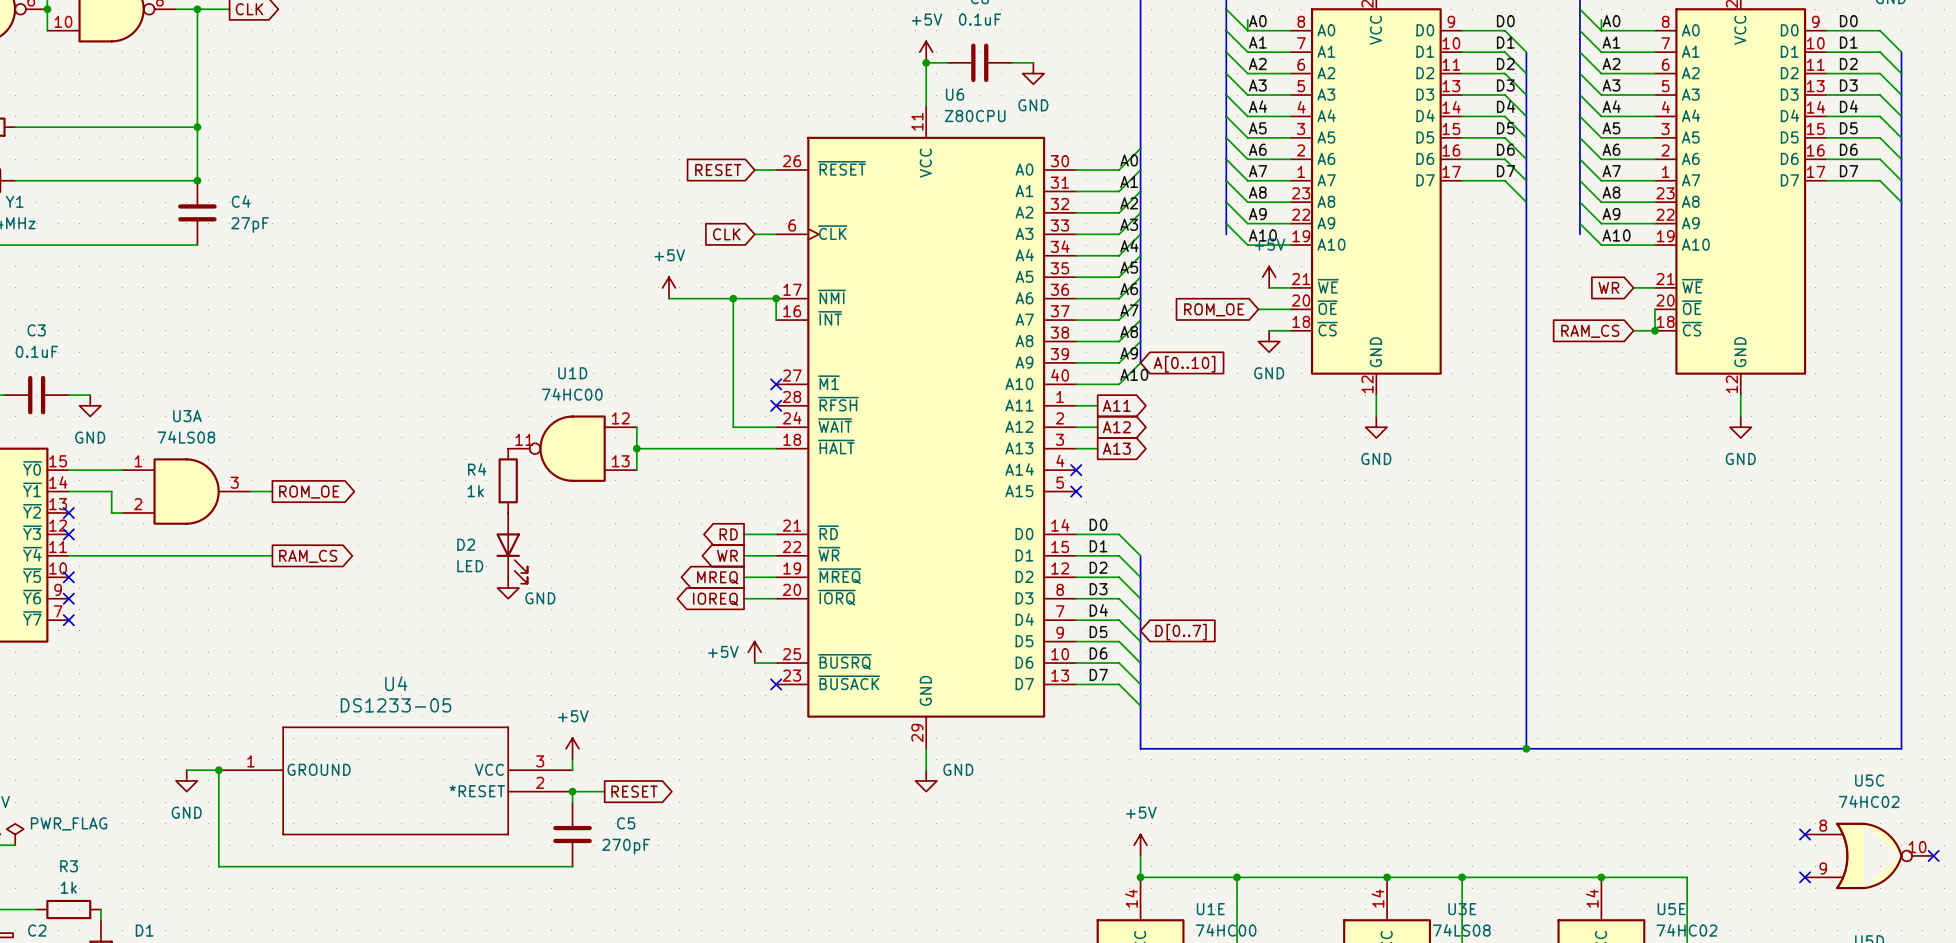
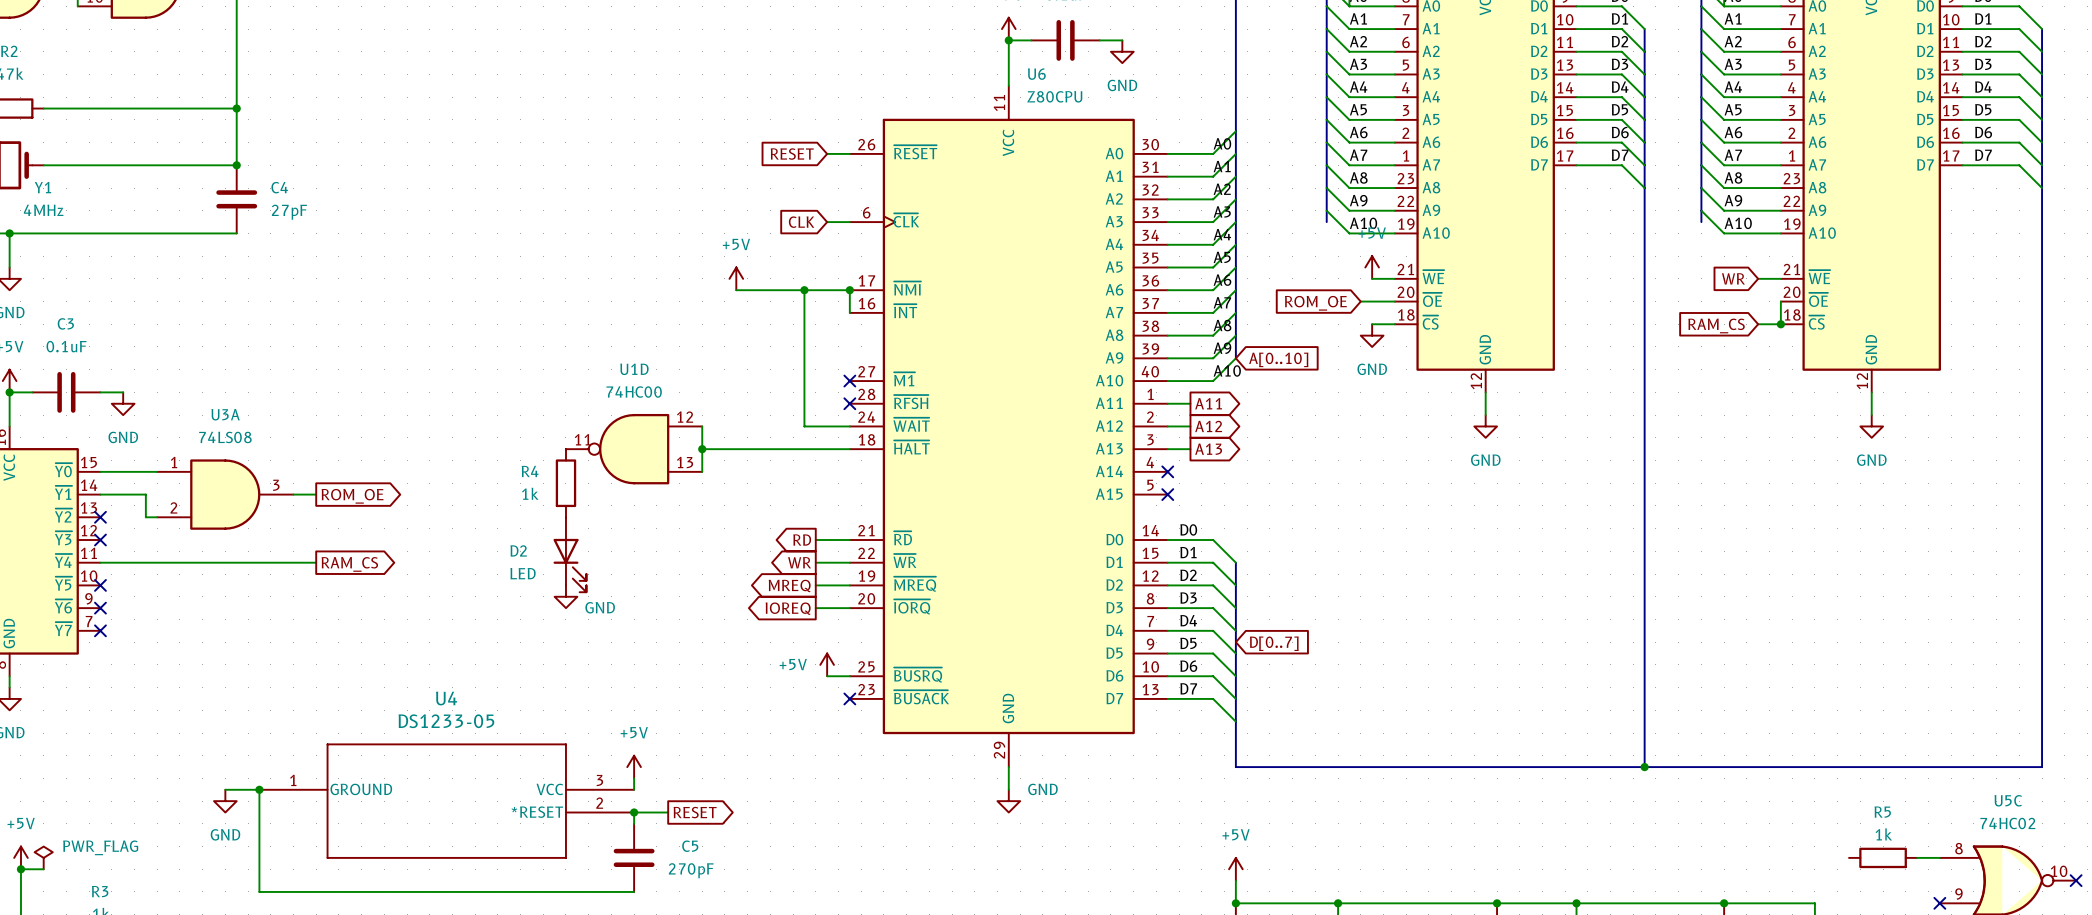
R5: none -> 1k (1883, 857)
wire: none -> (1917, 857) (1939, 857)
no-connect mark: (1805, 834) -> none

